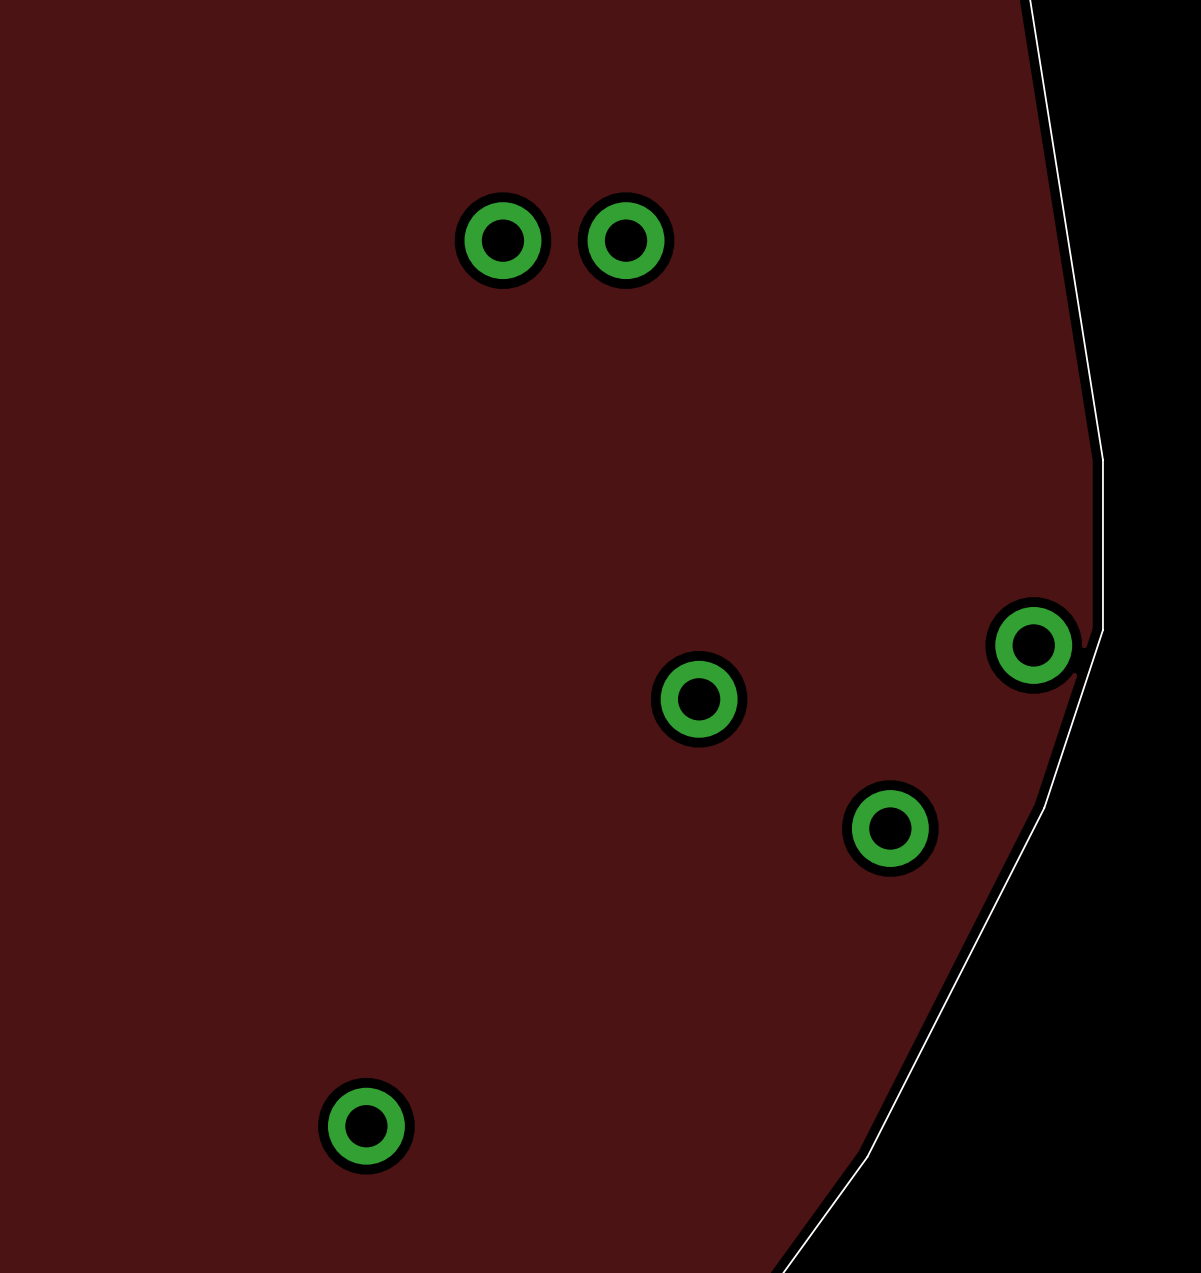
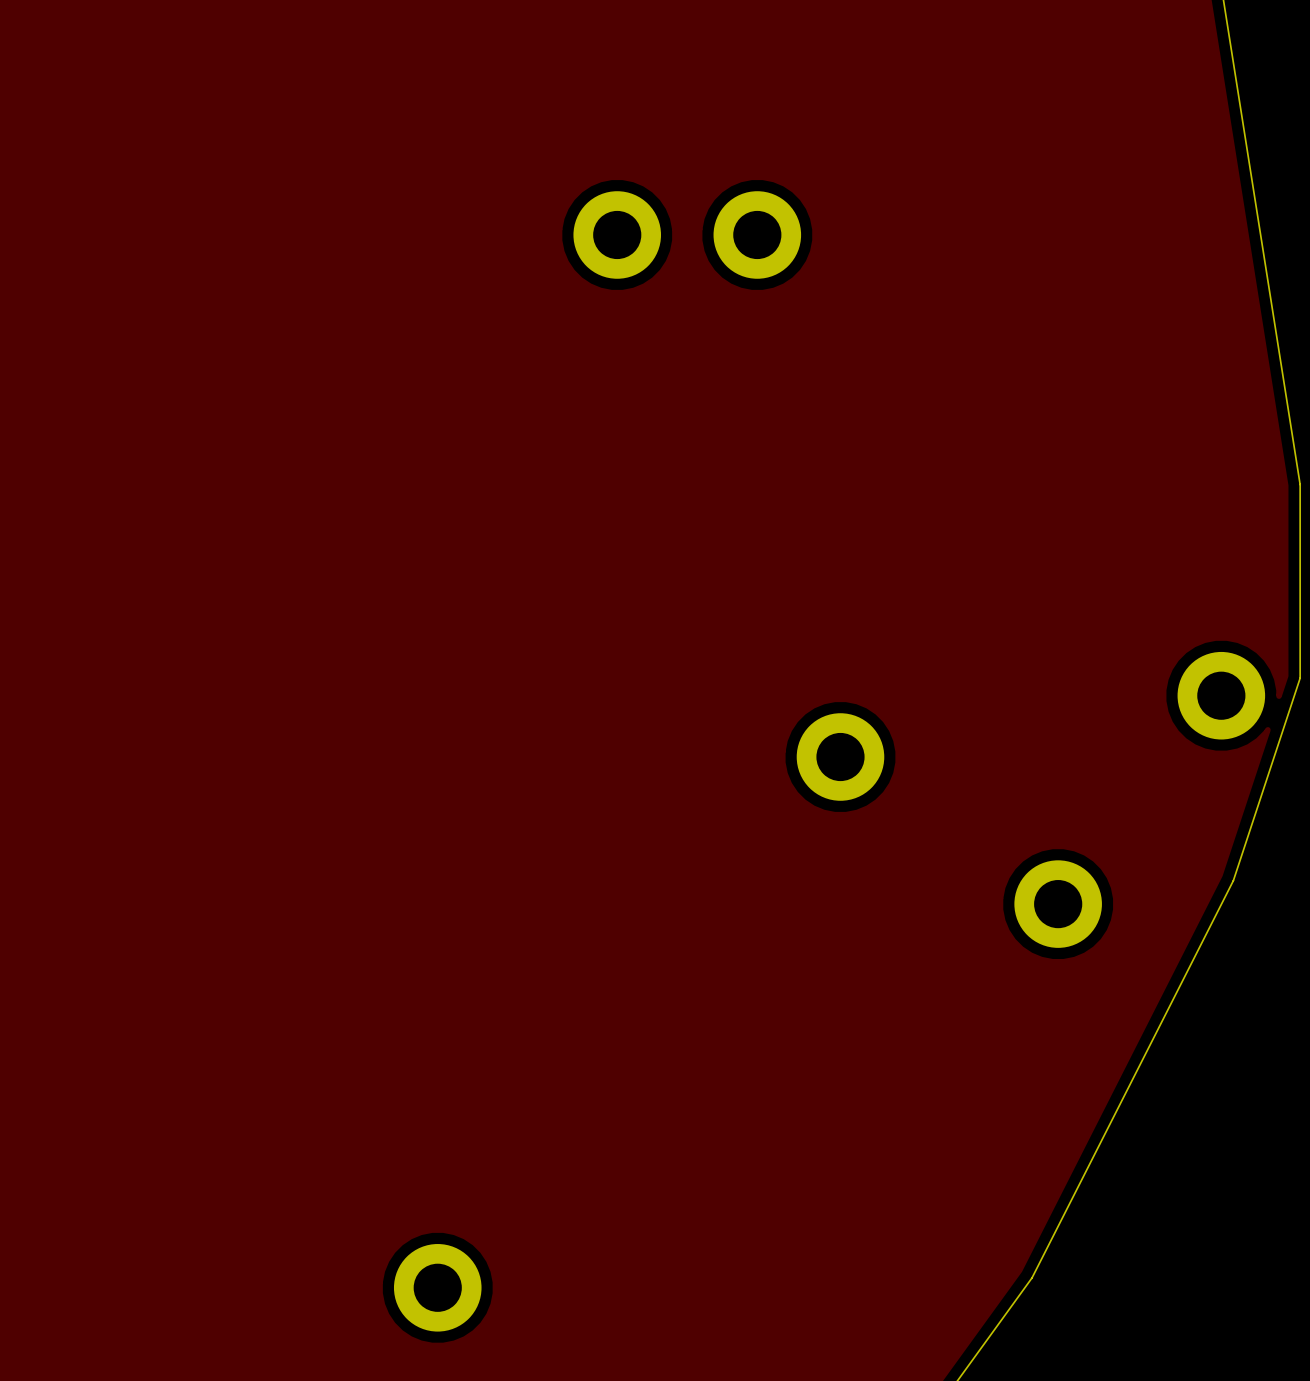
part position: (366, 1126) -> (437, 1287)

